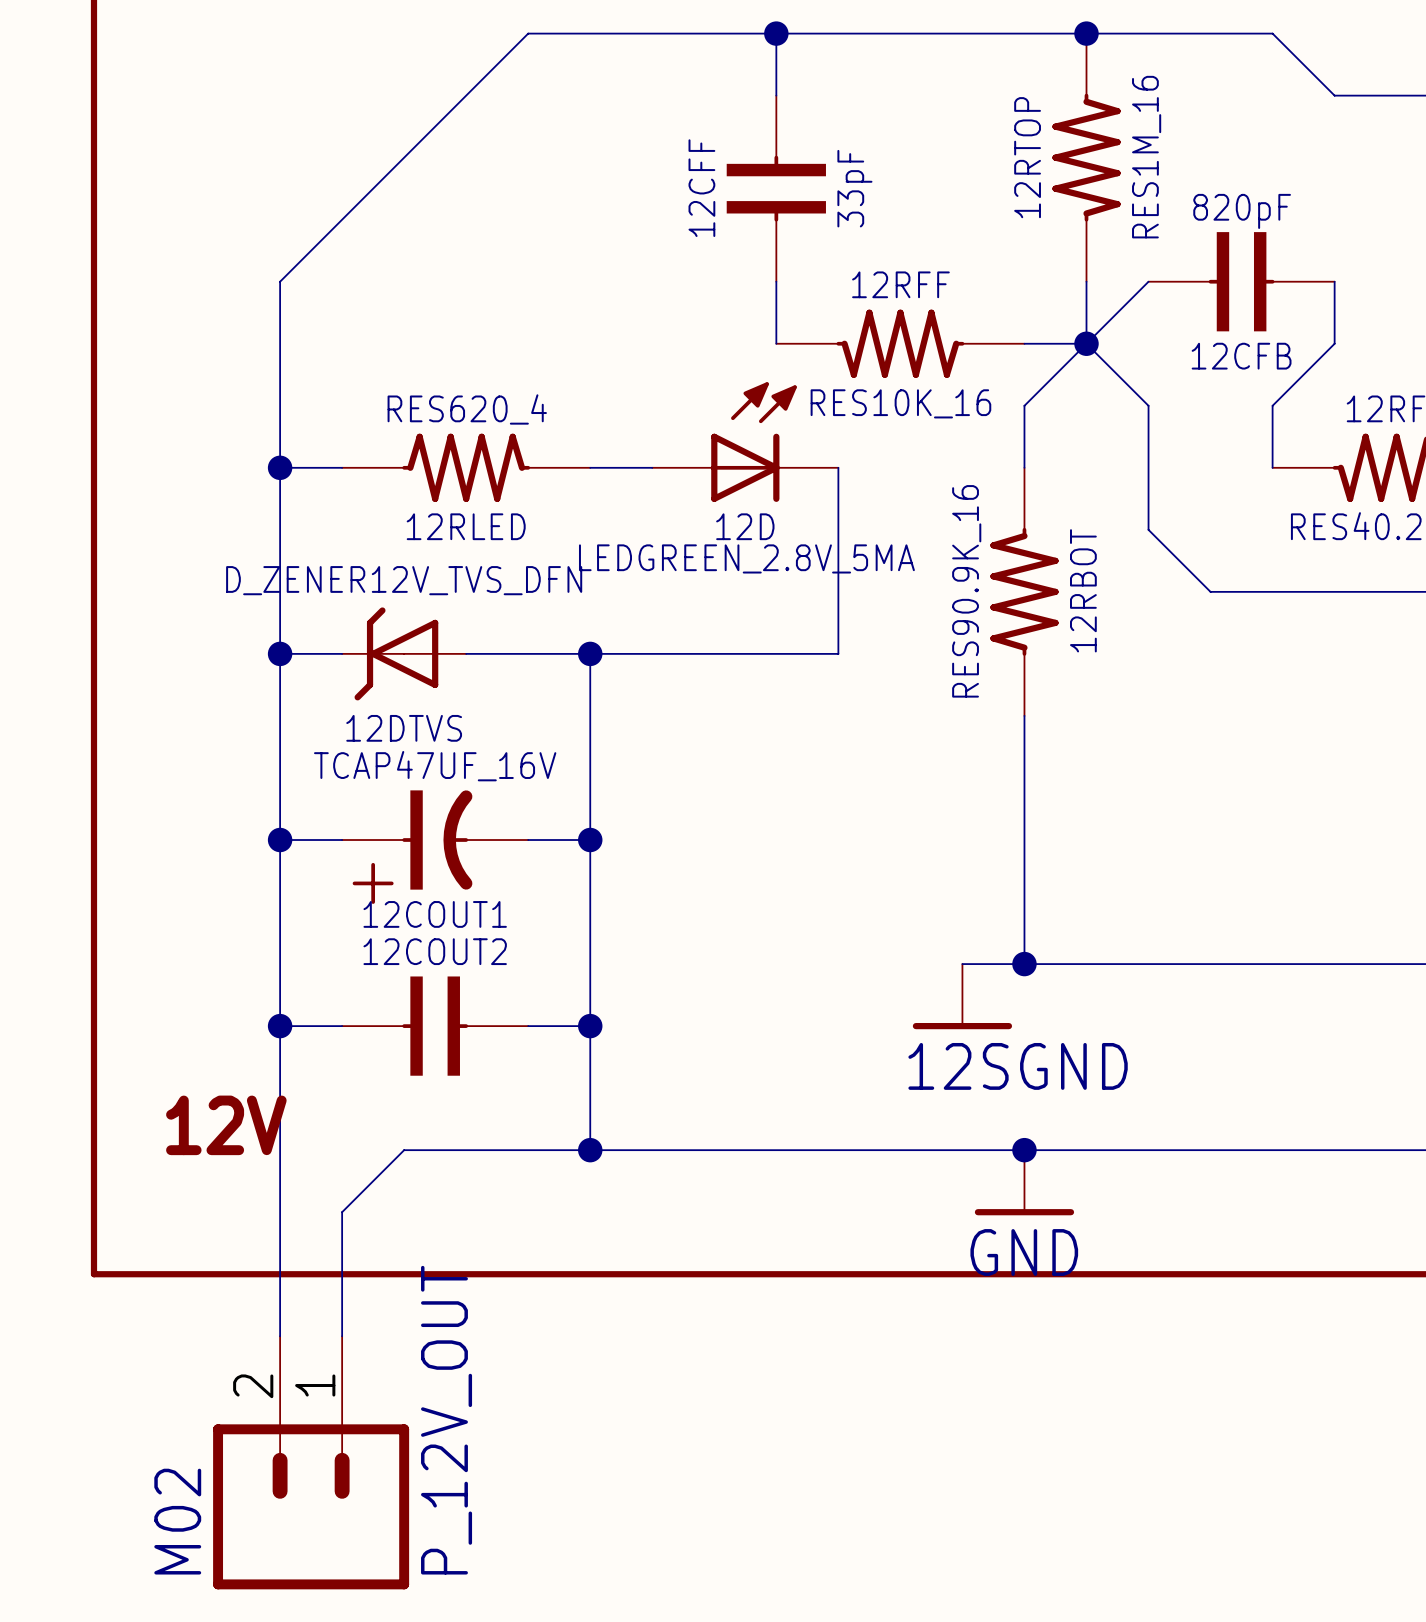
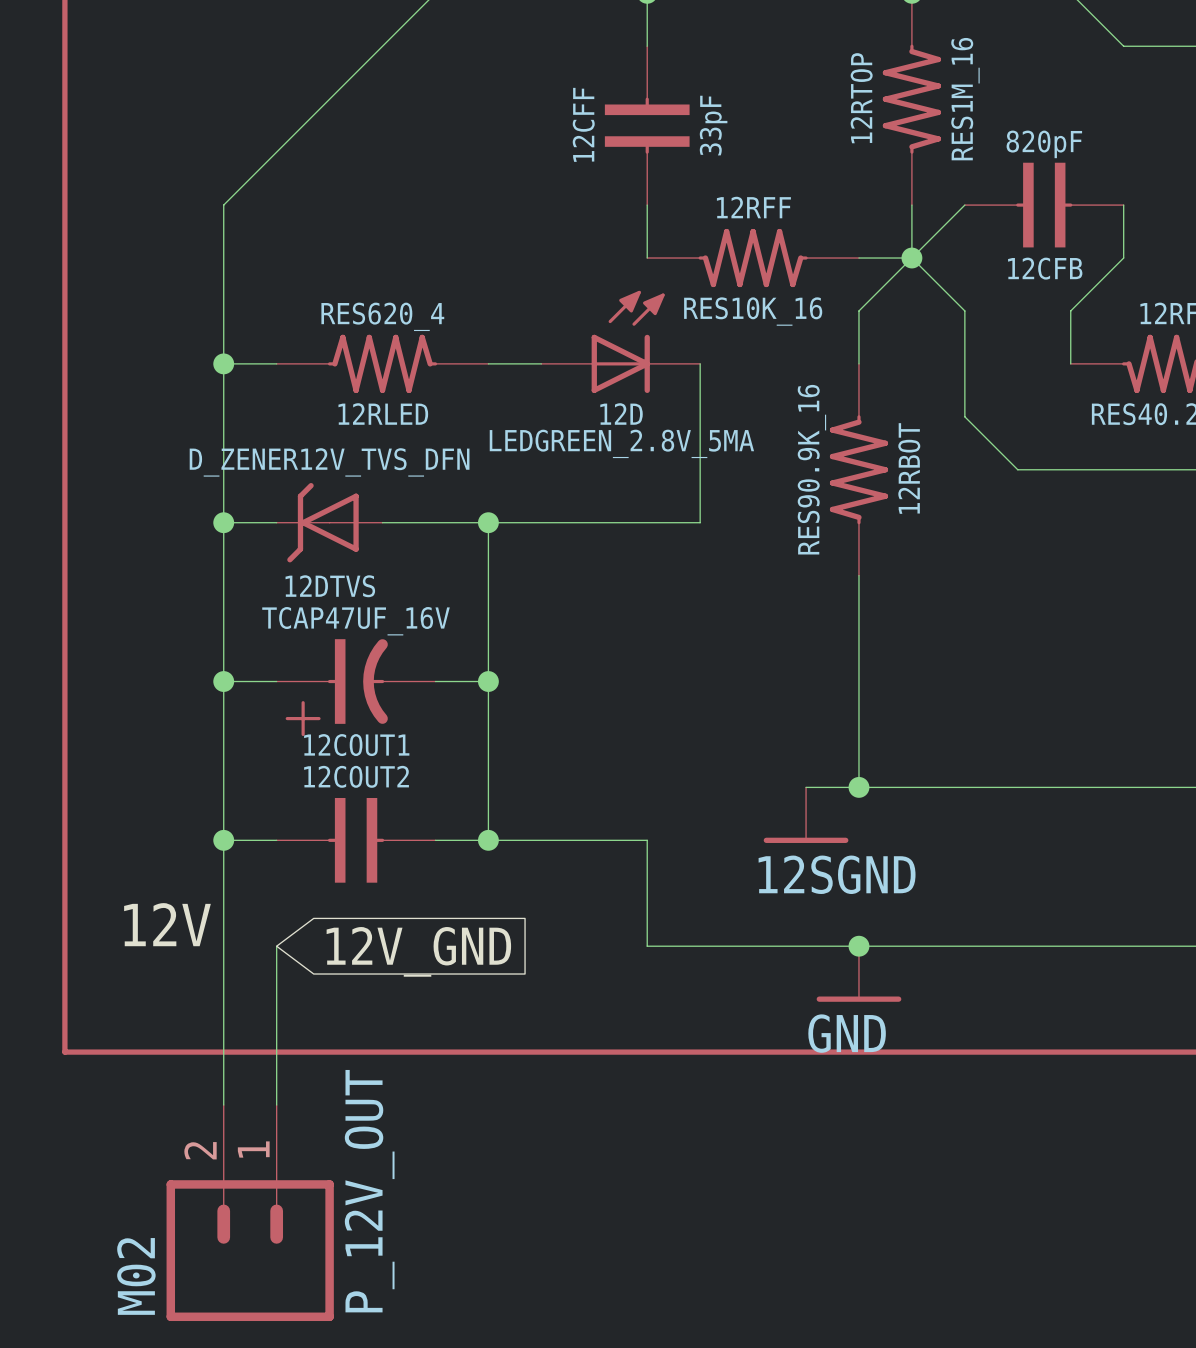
wire: (590, 1026) (590, 1150) -> (488, 840) (647, 840) (647, 946)
junction: (590, 1150) -> none
wire: (776, 1150) (404, 1150) (342, 1212) -> (276, 946) (276, 999)
global label: none -> 12V_GND (418, 951)

